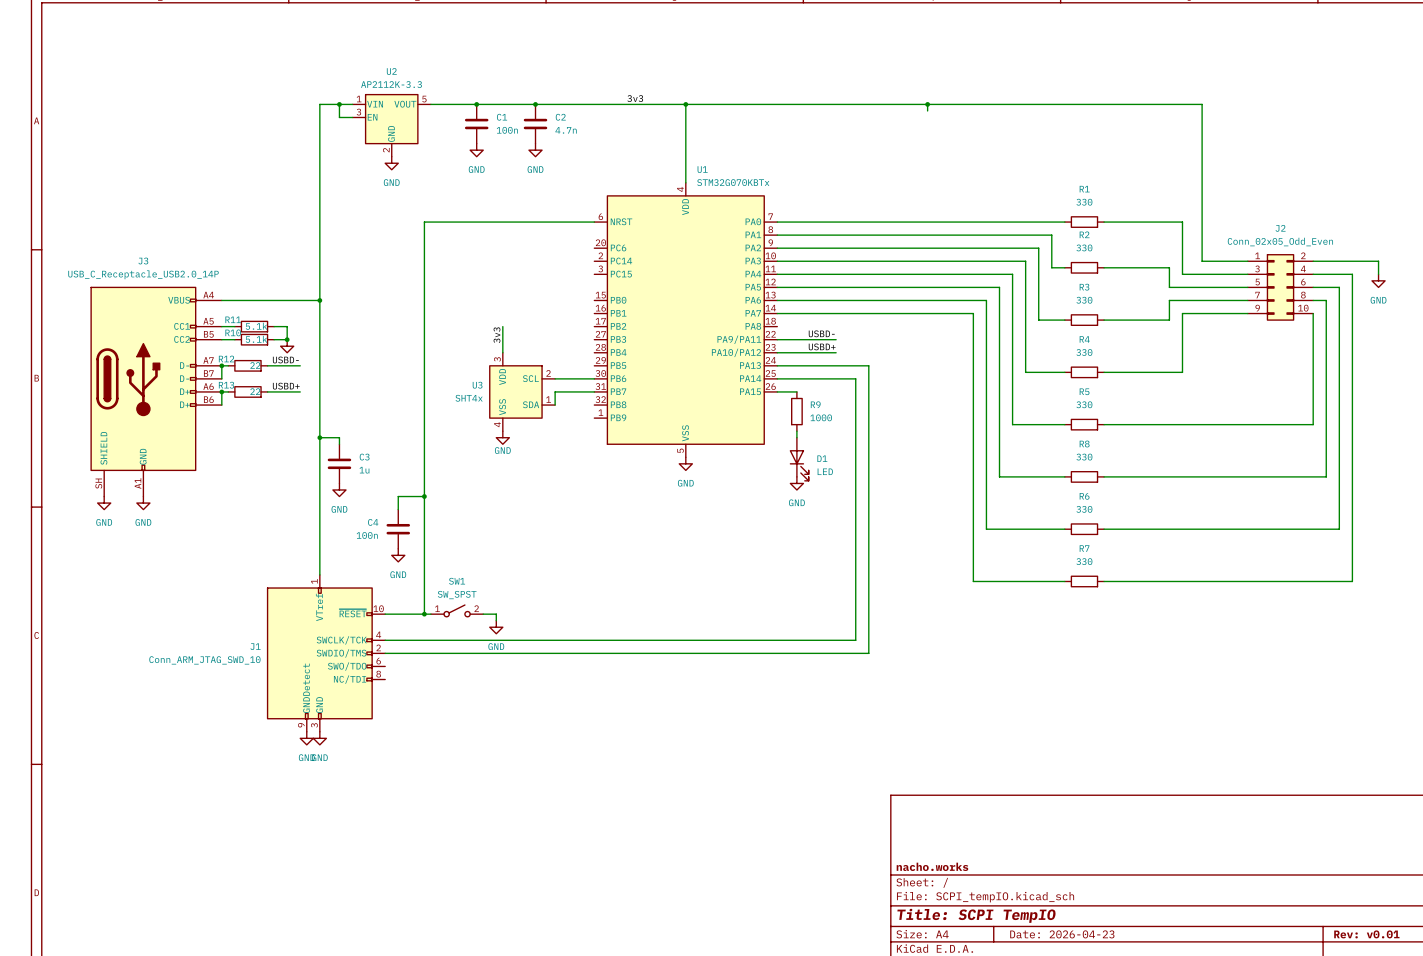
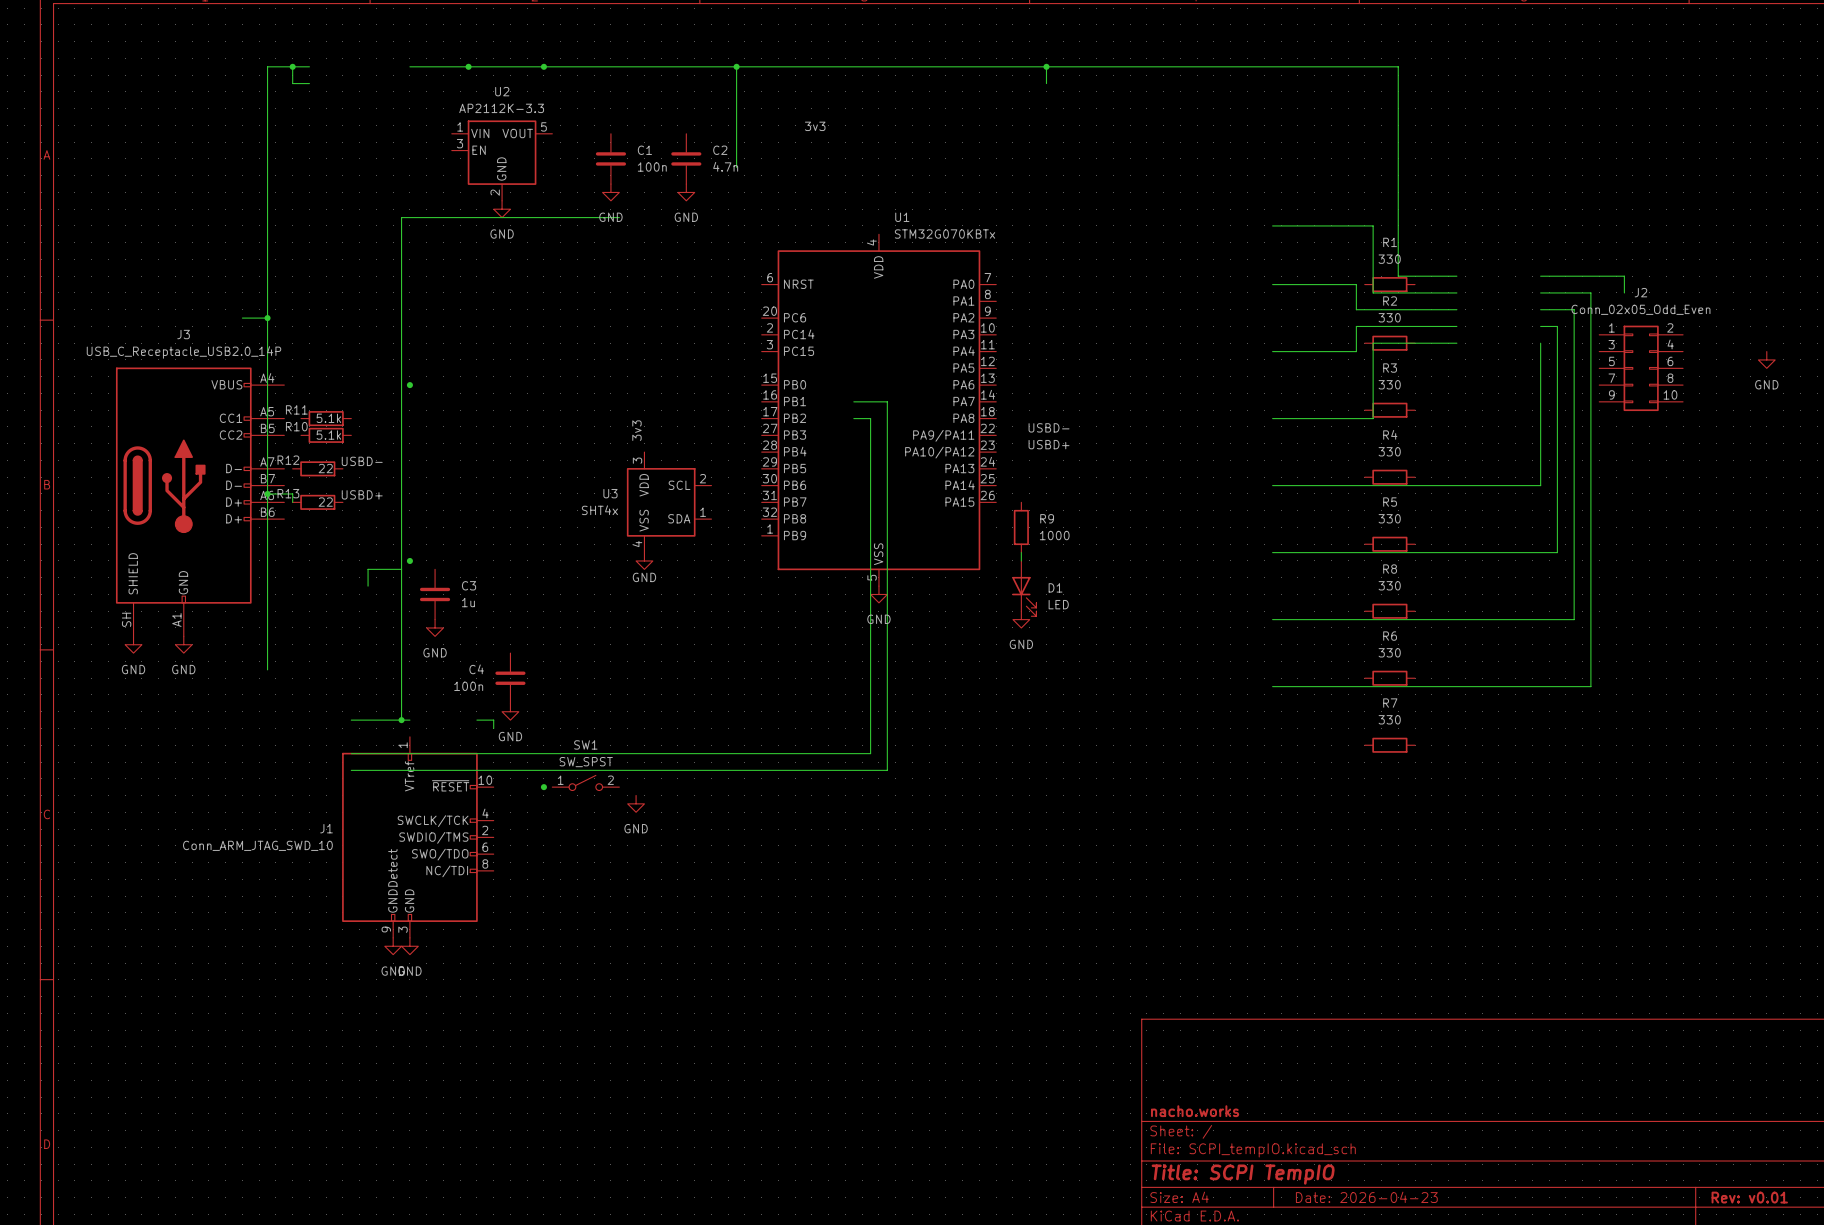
junction: none -> (292, 66)
wire: none -> (409, 66) (1398, 66) (1398, 276) (1456, 276)
junction: none -> (468, 66)
junction: none -> (543, 66)
junction: none -> (736, 66)
wire: none -> (1046, 66) (1046, 83)
junction: none -> (1046, 66)
wire: (339, 104) (339, 117) (352, 117) -> (292, 66) (292, 83) (309, 83)
junction: (339, 104) -> none
wire: (352, 104) (319, 104) (319, 574) -> (309, 66) (267, 66) (267, 669)
wire: (430, 104) (1202, 104) (1202, 261) (1247, 261) -> none
junction: (476, 104) -> none
junction: (535, 104) -> none
wire: (685, 104) (685, 182) -> (736, 66) (736, 167)
junction: (685, 104) -> none
wire: (927, 104) (927, 110) -> none
junction: (927, 104) -> none
wire: (594, 222) (424, 222) (424, 614) -> (619, 217) (401, 217) (401, 720)
wire: (777, 222) (992, 222) -> none
wire: (1058, 222) (1064, 222) -> (1356, 284) (1356, 309) (1456, 309)
wire: (1104, 222) (1182, 222) (1182, 274) (1247, 274) -> (1272, 225) (1373, 225) (1373, 292) (1456, 292)
wire: (777, 235) (1051, 235) (1051, 267) (1064, 267) -> none
wire: none -> (242, 318) (267, 318)
junction: none -> (267, 318)
wire: (777, 248) (1038, 248) (1038, 320) (1064, 320) -> none
wire: (777, 261) (1025, 261) (1025, 372) (1064, 372) -> none
wire: (1313, 261) (1378, 261) (1378, 274) -> (1540, 276) (1624, 276) (1624, 292)
wire: none -> (1415, 343) (1373, 343) (1373, 418) (1272, 418)
wire: (1136, 267) (1169, 267) (1169, 287) (1247, 287) -> none
wire: (777, 274) (992, 274) -> none
wire: (1012, 274) (1012, 424) (1064, 424) -> (1297, 351) (1356, 351) (1356, 326) (1456, 326)
wire: (1313, 274) (1352, 274) (1352, 581) (1104, 581) -> (1540, 292) (1590, 292) (1590, 686) (1272, 686)
wire: (777, 287) (999, 287) (999, 476) (1064, 476) -> none
wire: (1313, 287) (1339, 287) (1339, 529) (1104, 529) -> (1540, 309) (1574, 309) (1574, 619) (1272, 619)
wire: (221, 300) (319, 300) -> none
wire: (777, 300) (986, 300) (986, 529) (1064, 529) -> none
wire: (1247, 300) (1169, 300) (1169, 320) (1104, 320) -> none
wire: (1313, 300) (1326, 300) (1326, 476) (1104, 476) -> (1540, 326) (1557, 326) (1557, 552) (1272, 552)
wire: none -> (853, 401) (887, 401) (887, 770) (351, 770)
wire: (777, 313) (973, 313) (973, 581) (1064, 581) -> none
wire: (1247, 313) (1182, 313) (1182, 372) (1104, 372) -> none
wire: (1313, 313) (1313, 424) (1104, 424) -> (1540, 343) (1540, 485) (1272, 485)
wire: (221, 326) (234, 326) -> none
wire: (274, 326) (287, 326) (287, 339) (274, 339) -> none
wire: (502, 326) (502, 352) -> none
wire: none -> (853, 418) (870, 418) (870, 753) (351, 753)
wire: (221, 339) (234, 339) -> none
junction: (287, 339) -> none
wire: (777, 339) (836, 339) -> none
power symbol: (287, 346) -> none
wire: (777, 352) (836, 352) -> none
junction: (221, 365) -> none
wire: (228, 365) (221, 365) (221, 378) -> none
wire: (267, 365) (300, 365) -> none
wire: (777, 365) (868, 365) (868, 653) (385, 653) -> none
wire: (555, 378) (594, 378) -> none
wire: (777, 378) (855, 378) (855, 640) (385, 640) -> none
junction: none -> (267, 493)
junction: (221, 391) -> none
wire: (228, 391) (221, 391) (221, 405) -> (292, 502) (292, 493) (267, 493)
wire: (267, 391) (300, 391) -> none
wire: (594, 391) (555, 391) (555, 405) -> none
wire: (777, 391) (796, 391) -> none
wire: (319, 437) (339, 437) (339, 444) -> none
wire: (424, 496) (398, 496) (398, 509) -> (401, 569) (368, 569) (368, 586)
junction: (424, 496) -> none
junction: none -> (401, 720)
wire: (385, 614) (430, 614) -> (351, 720) (409, 720)
wire: (483, 614) (496, 614) (496, 620) -> (476, 720) (493, 720) (493, 728)

